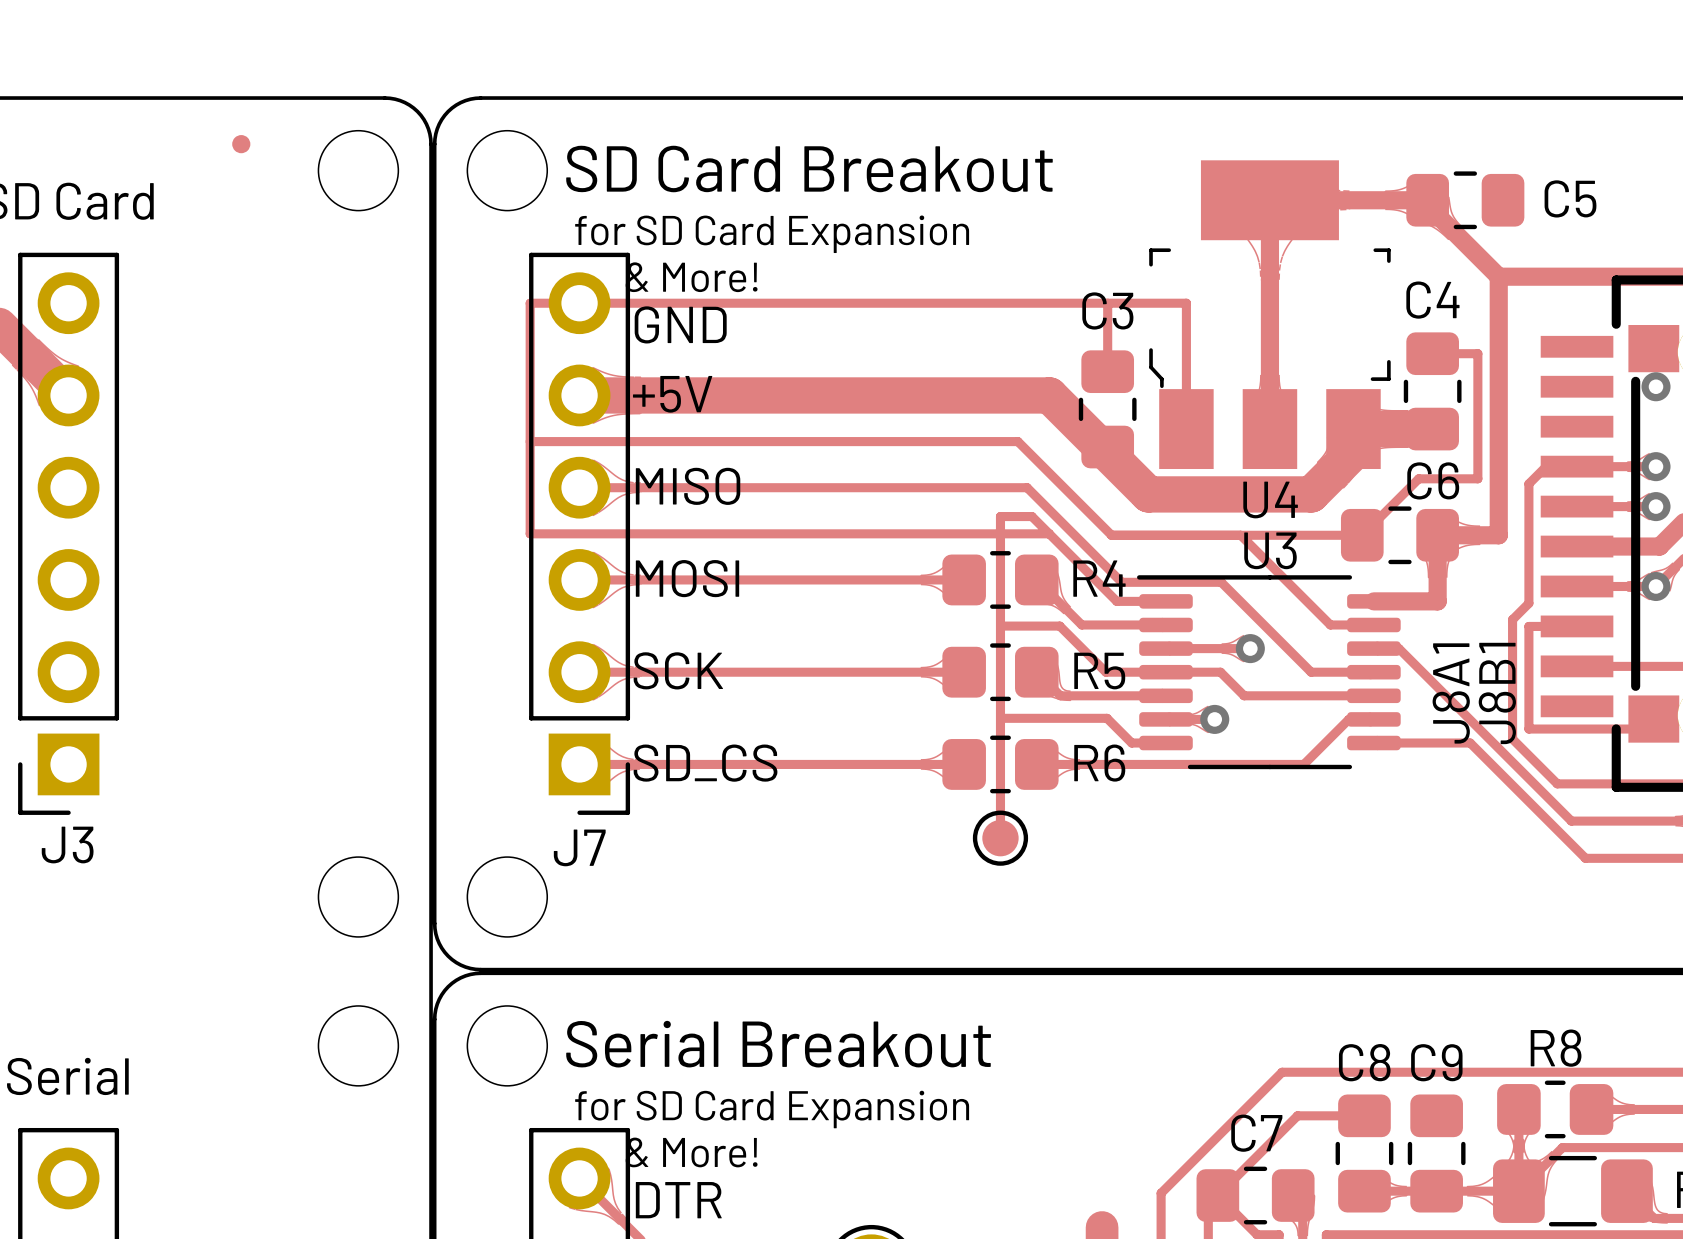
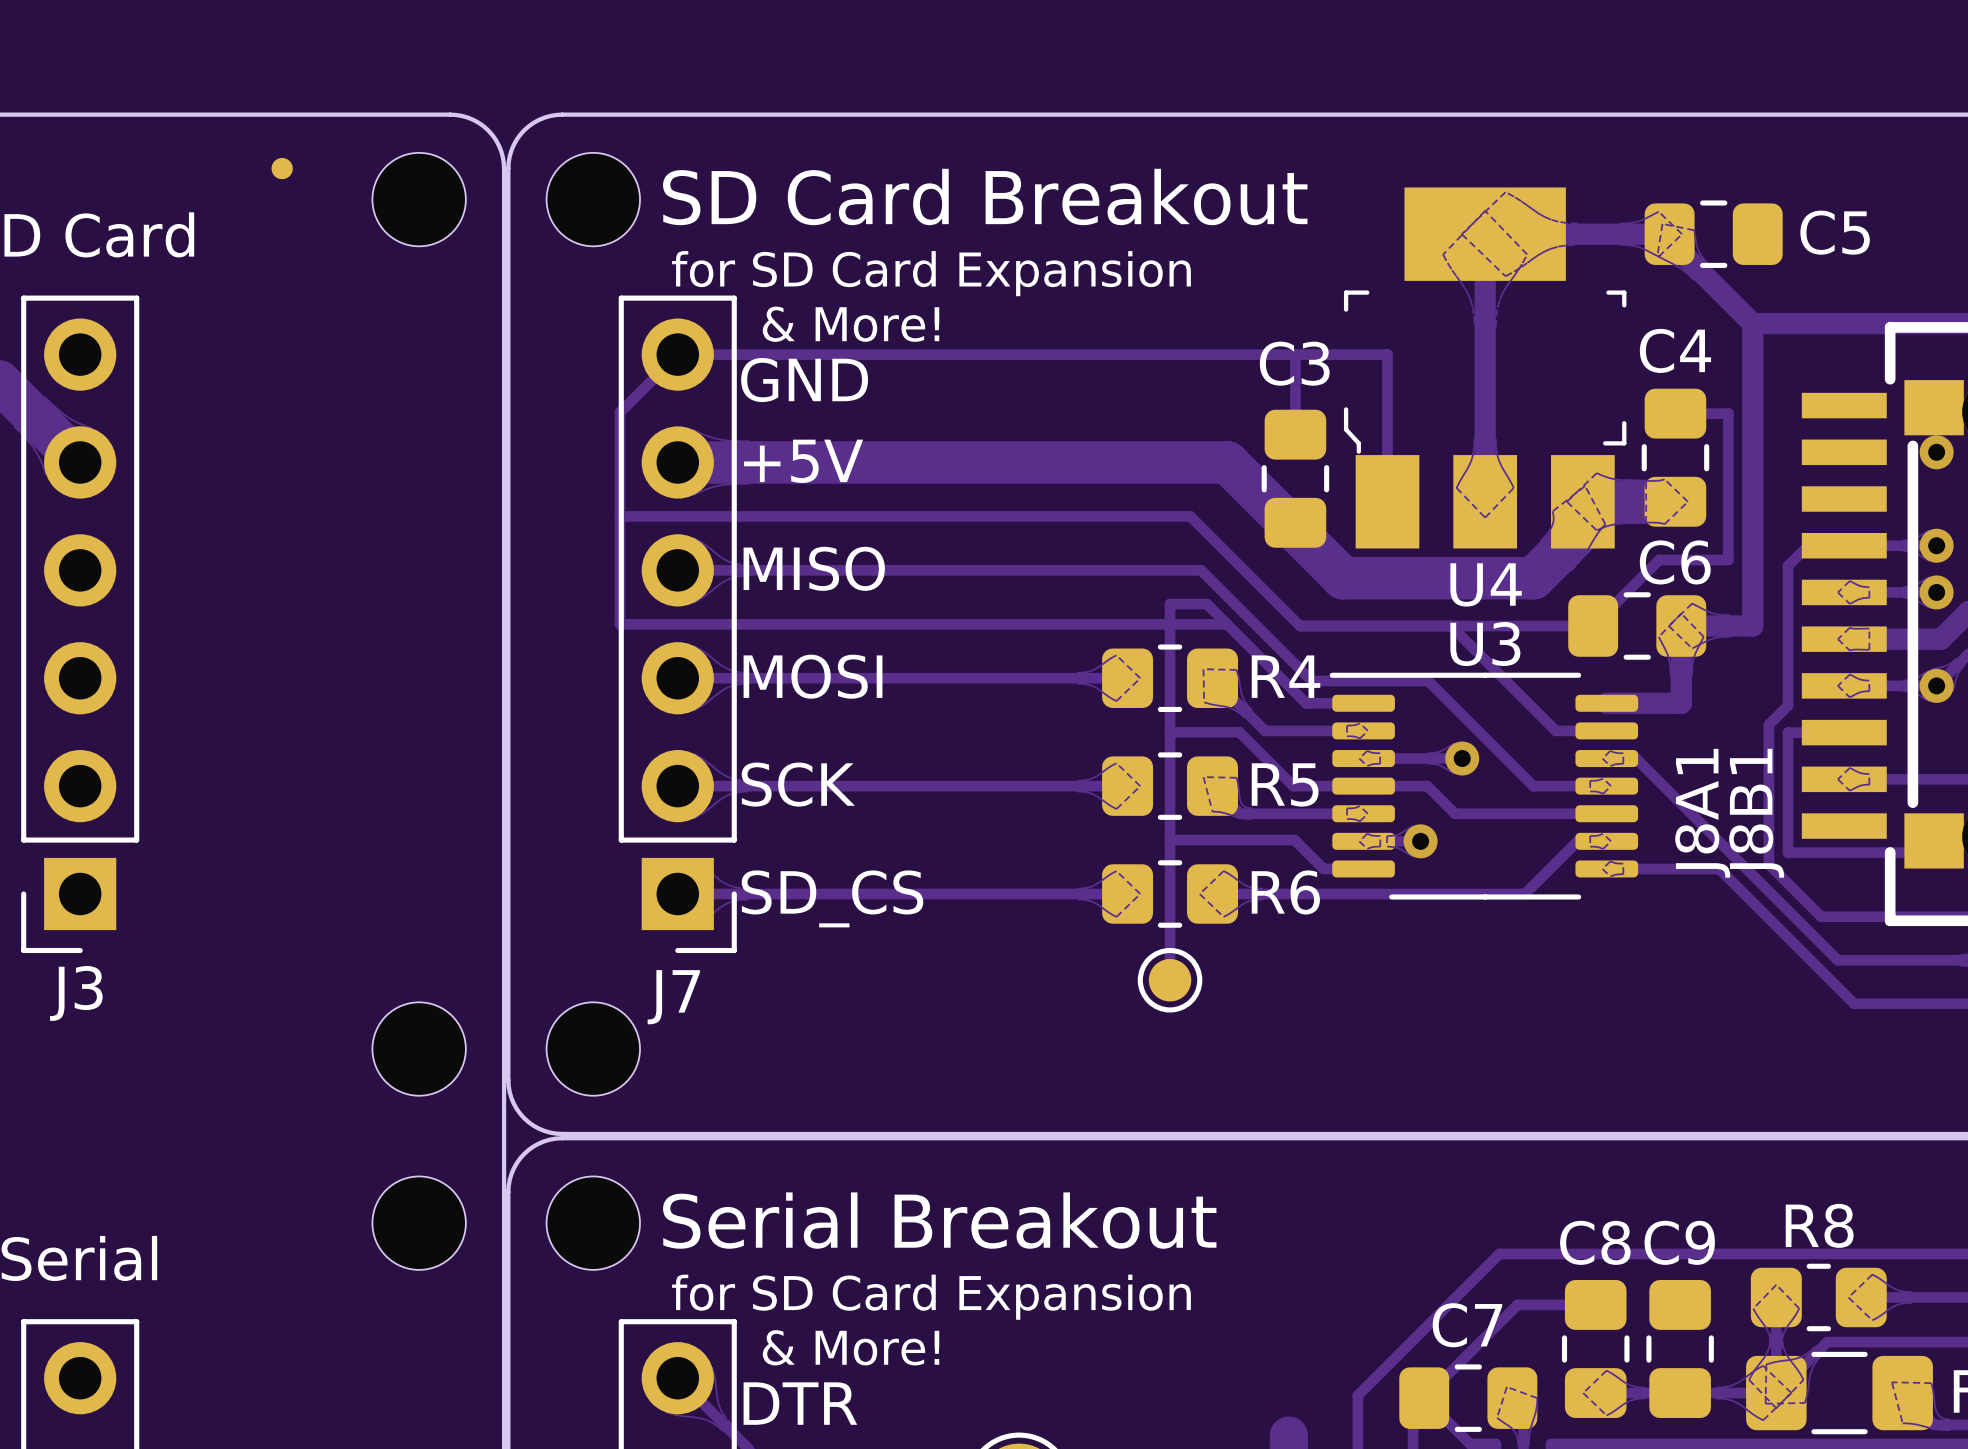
track: (579, 303) (530, 303) (530, 352) -> (677, 354) (620, 412)

